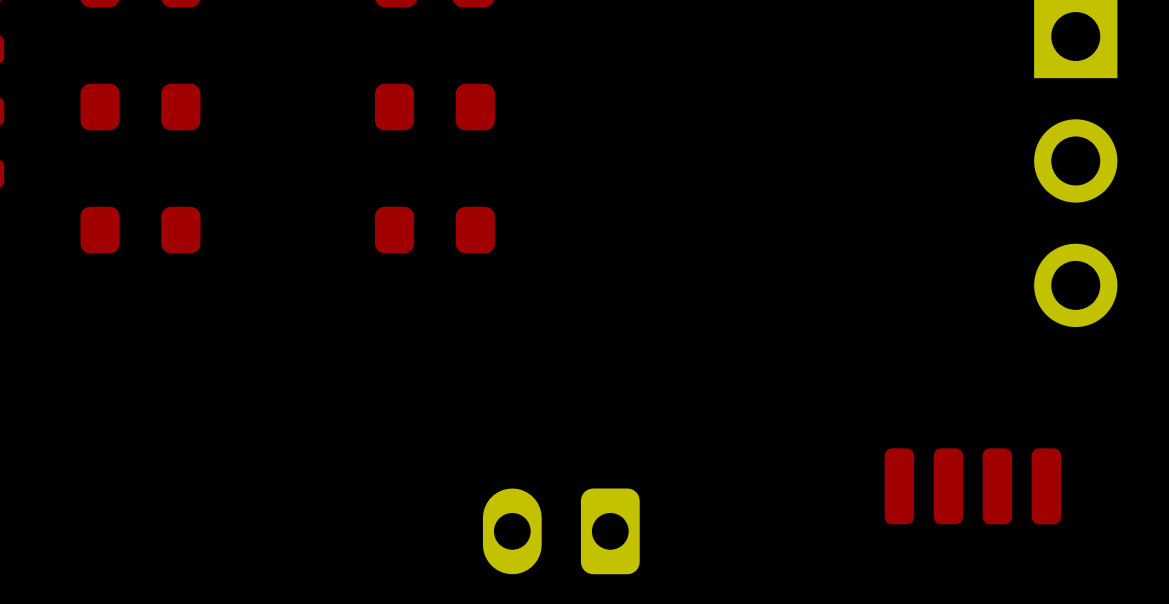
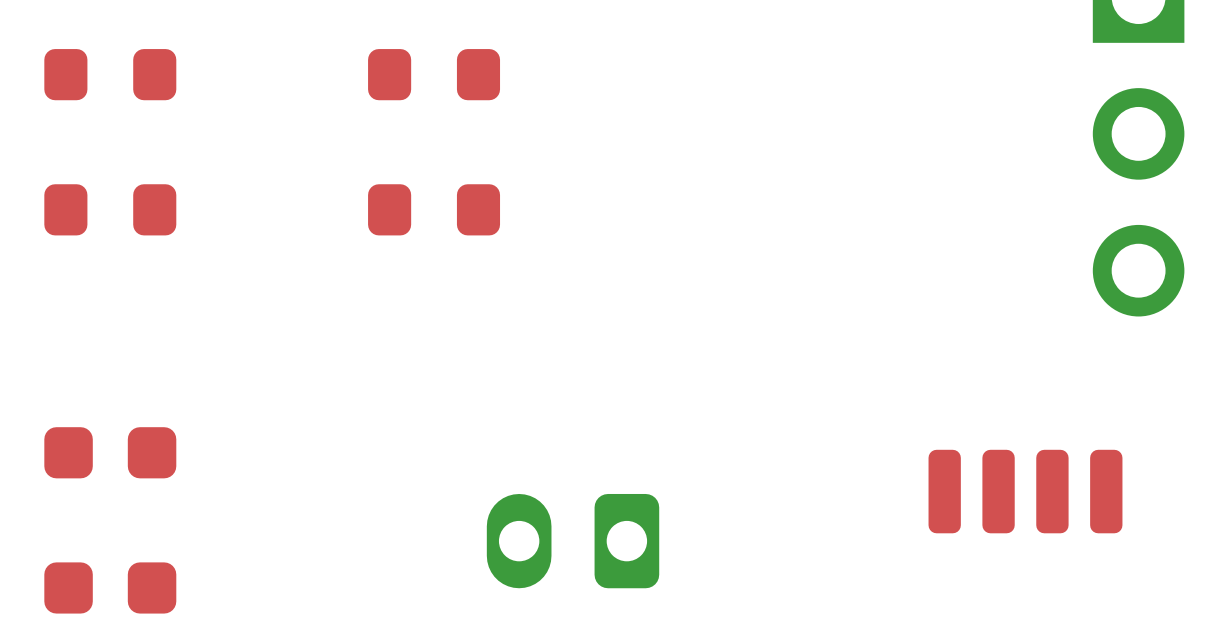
part: none -> (110, 452)
part: none -> (110, 587)

